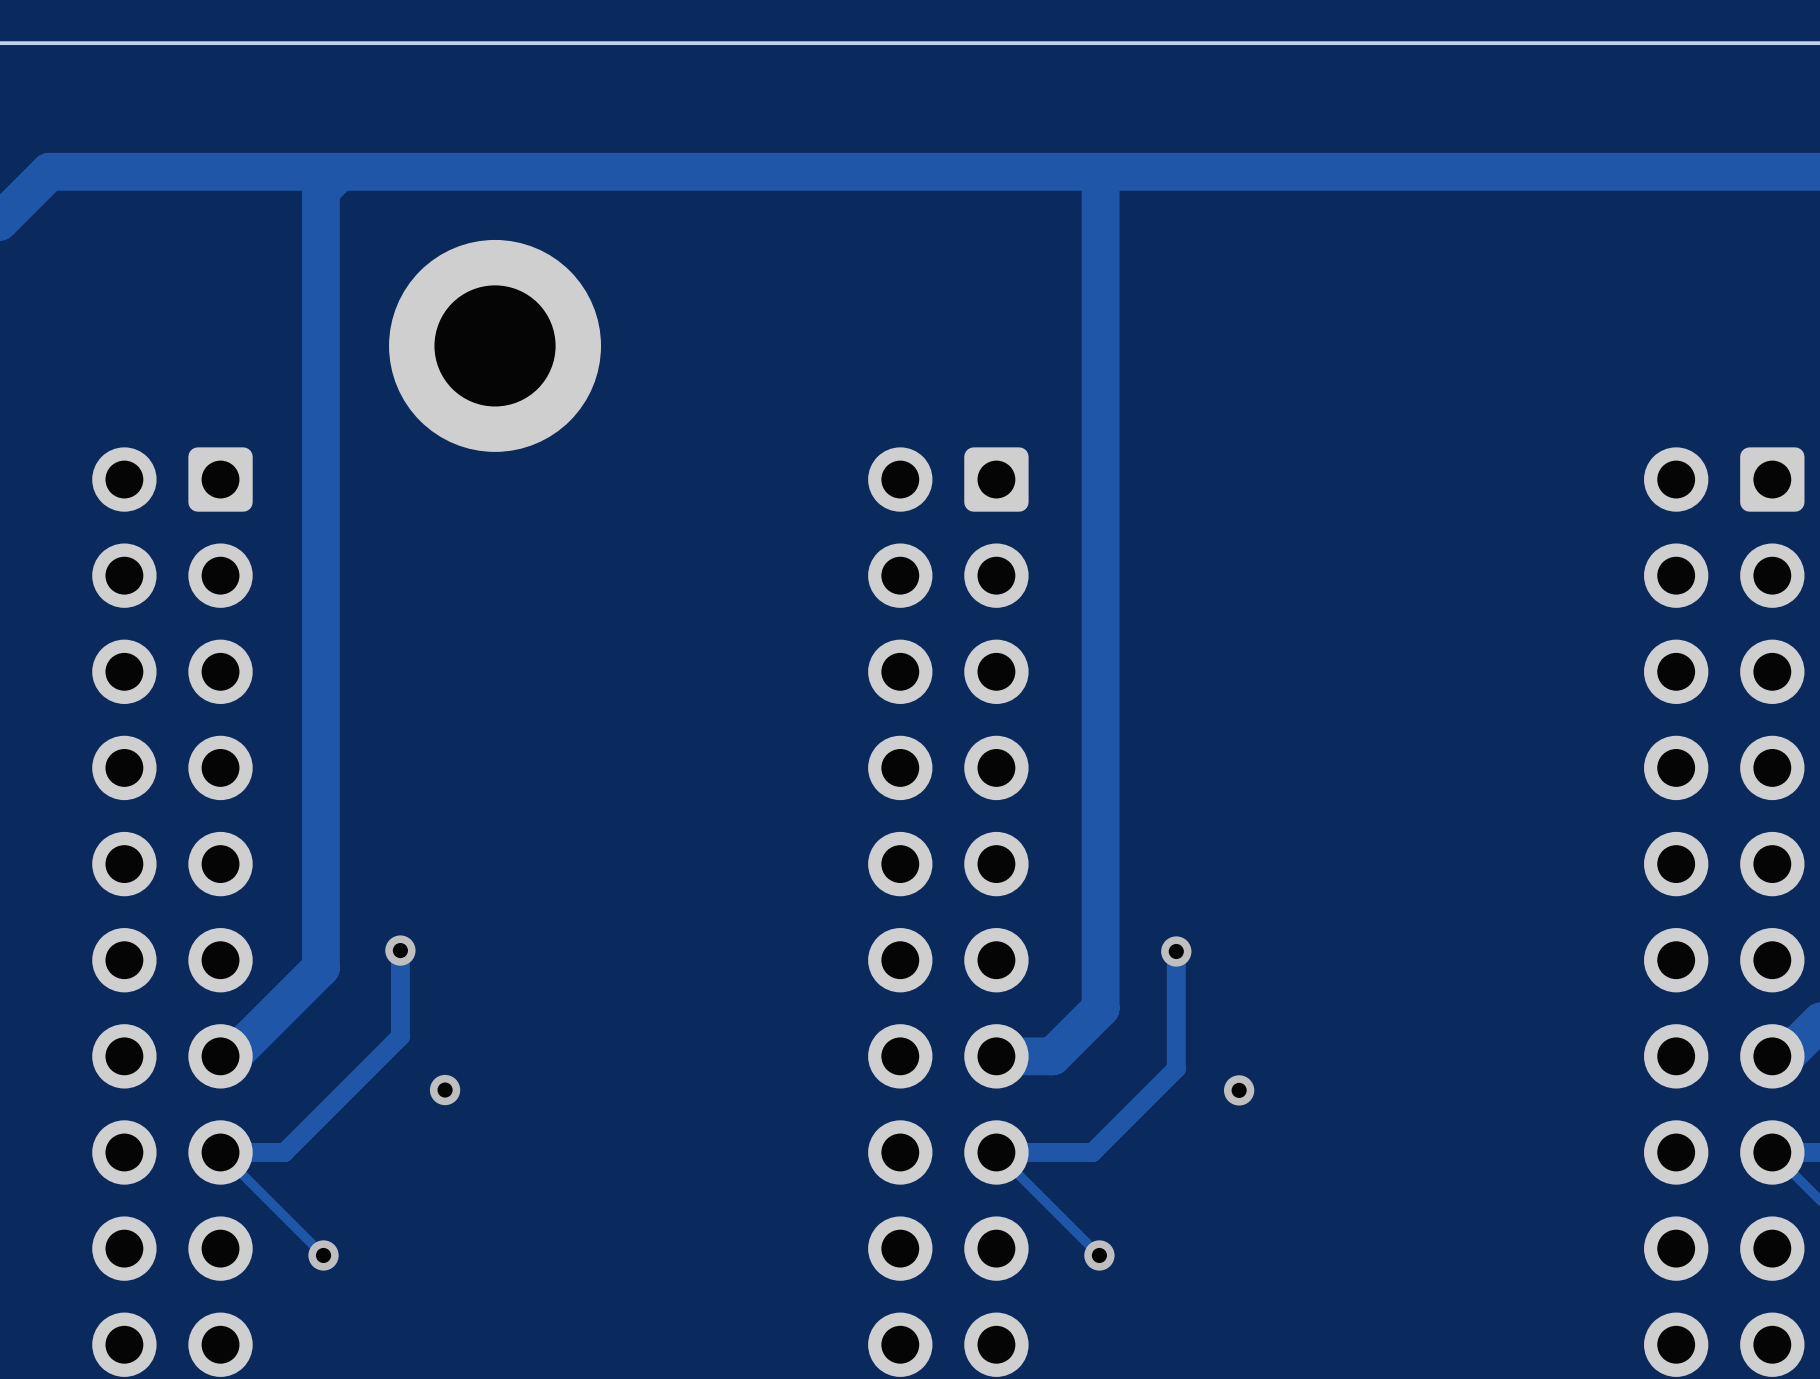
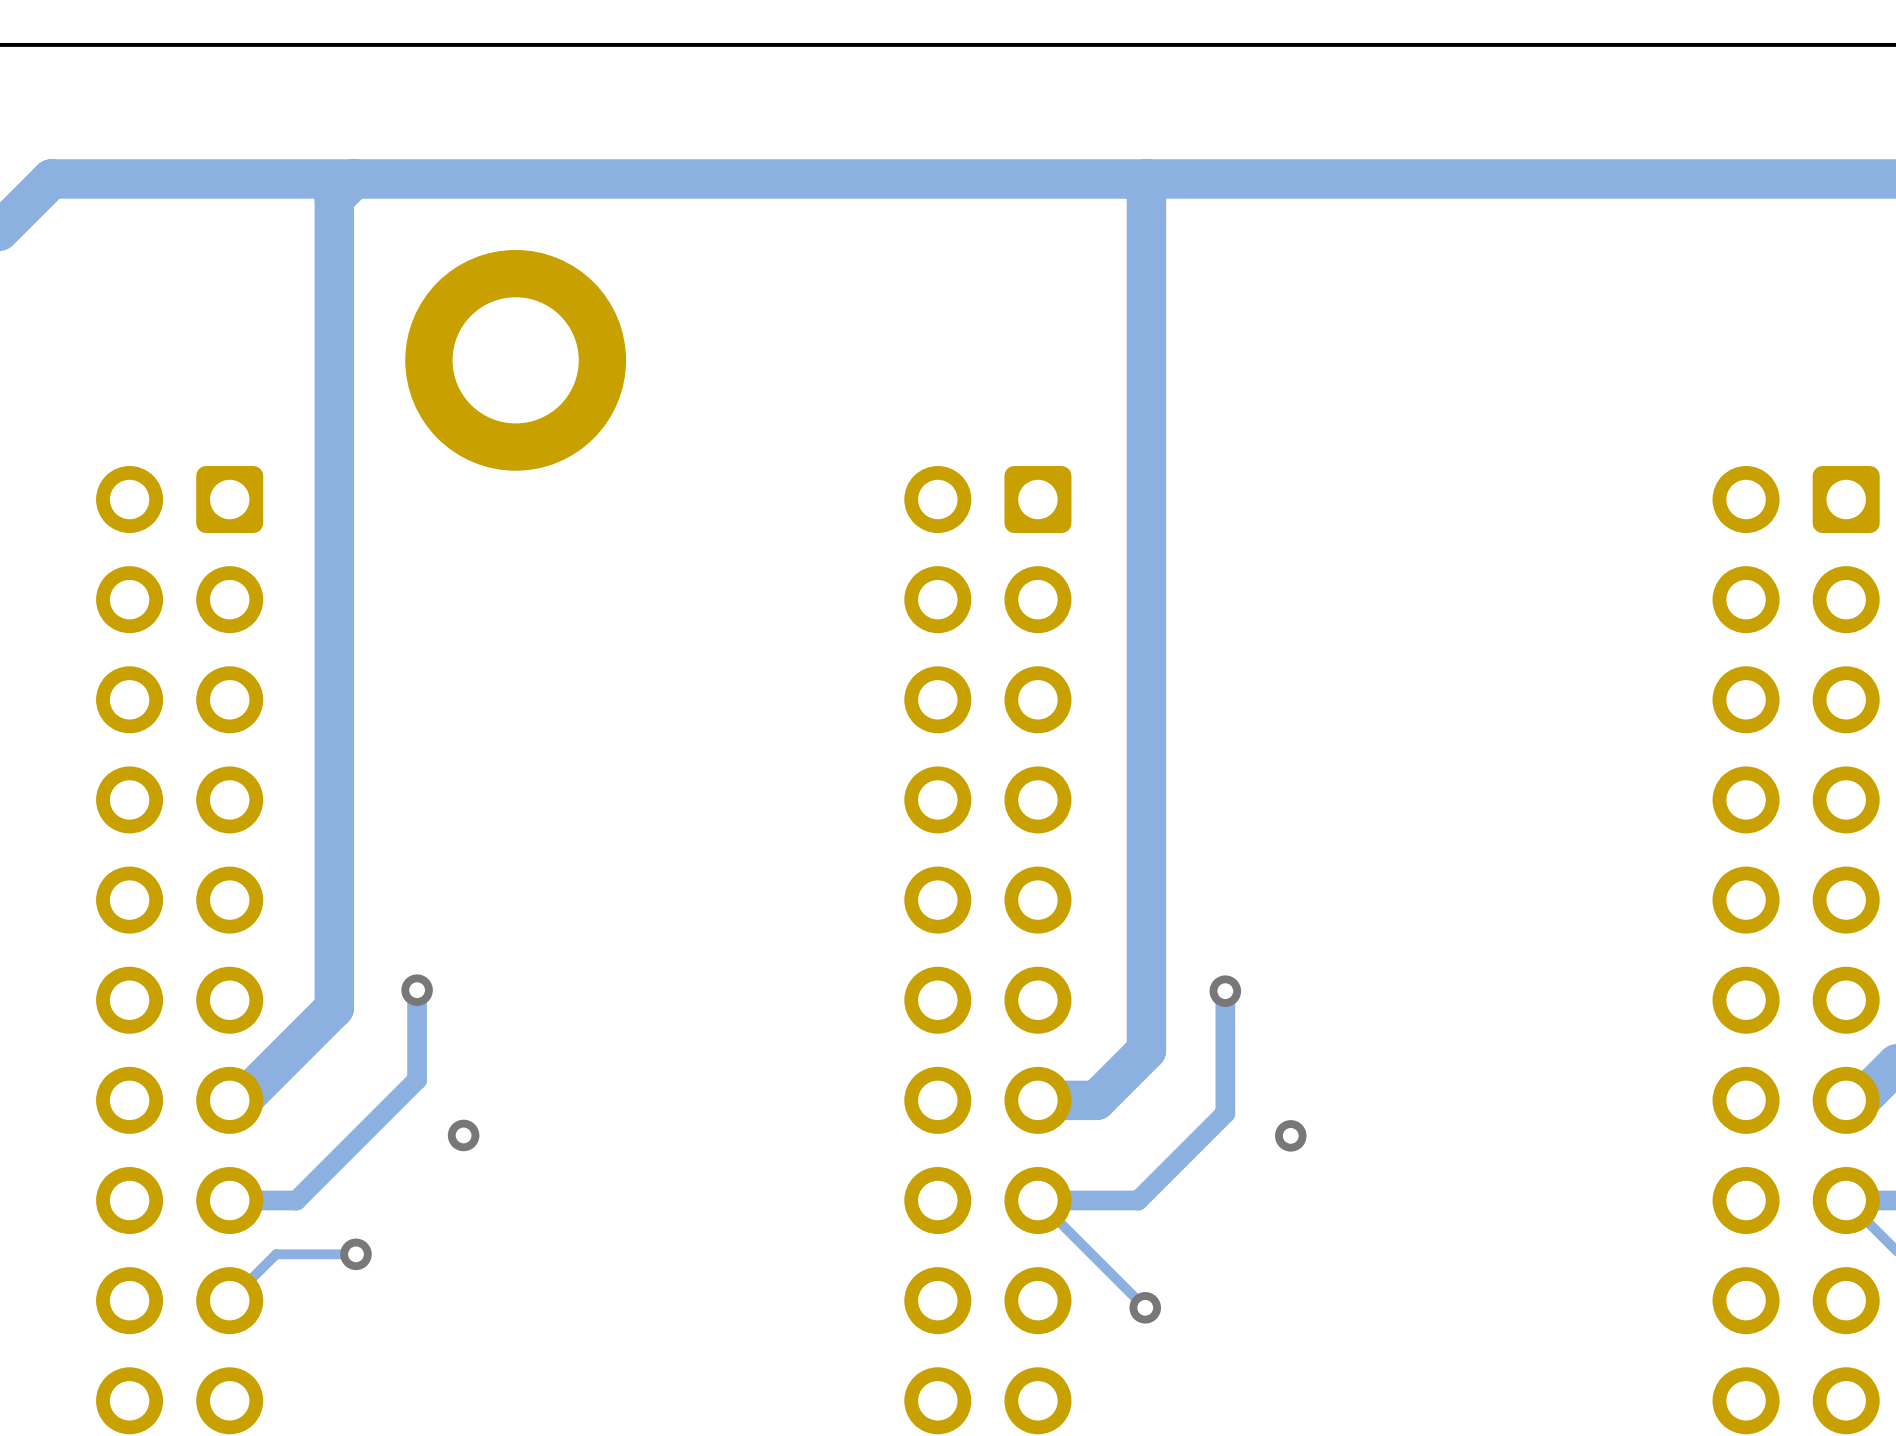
track: (220, 1152) (323, 1255) -> none
track: none -> (355, 1254) (276, 1254) (229, 1300)
via position: (323, 1255) -> (355, 1254)

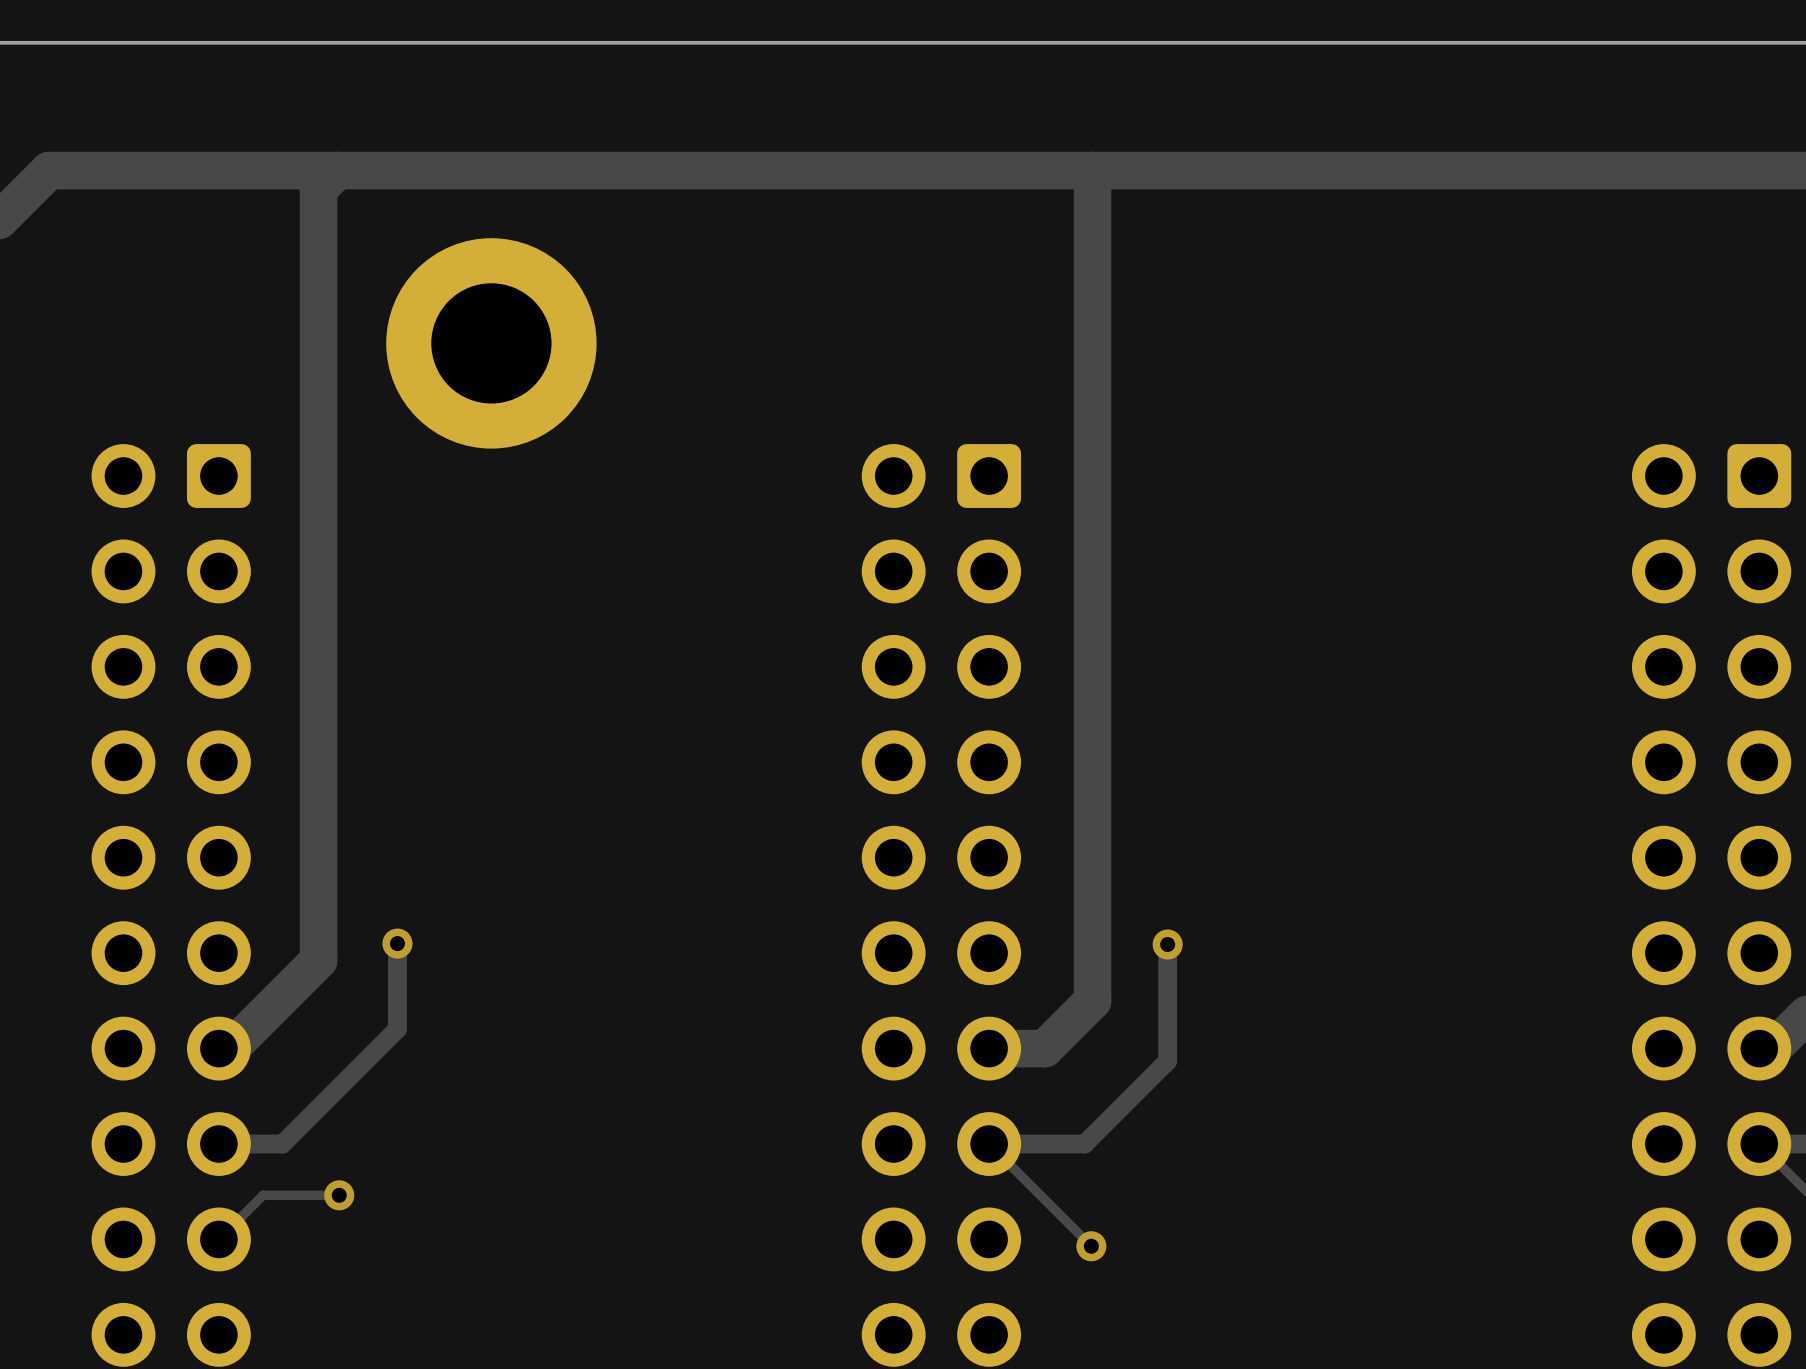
via: (463, 1135) -> none
via: (1290, 1135) -> none

